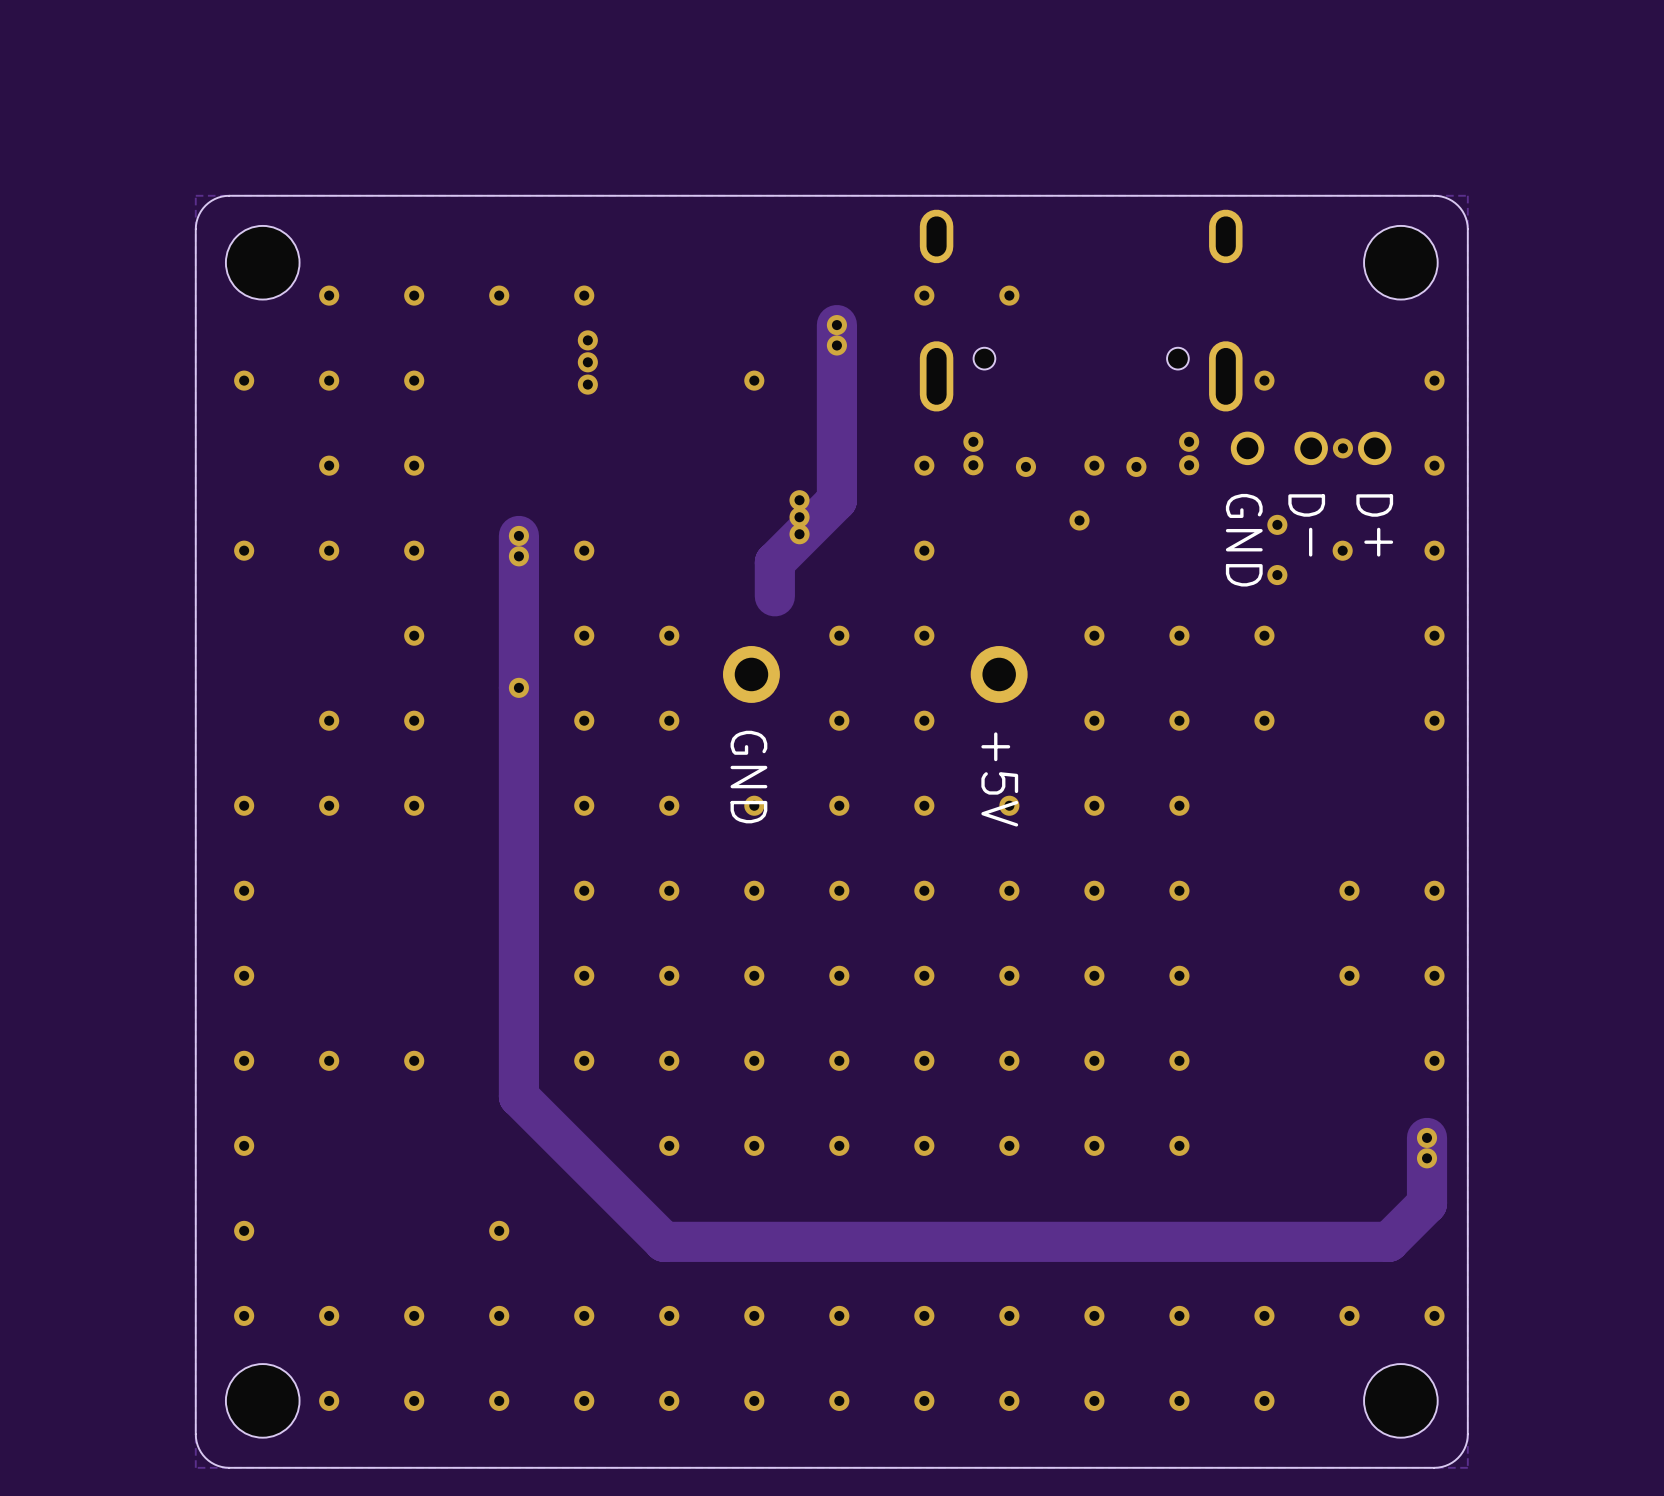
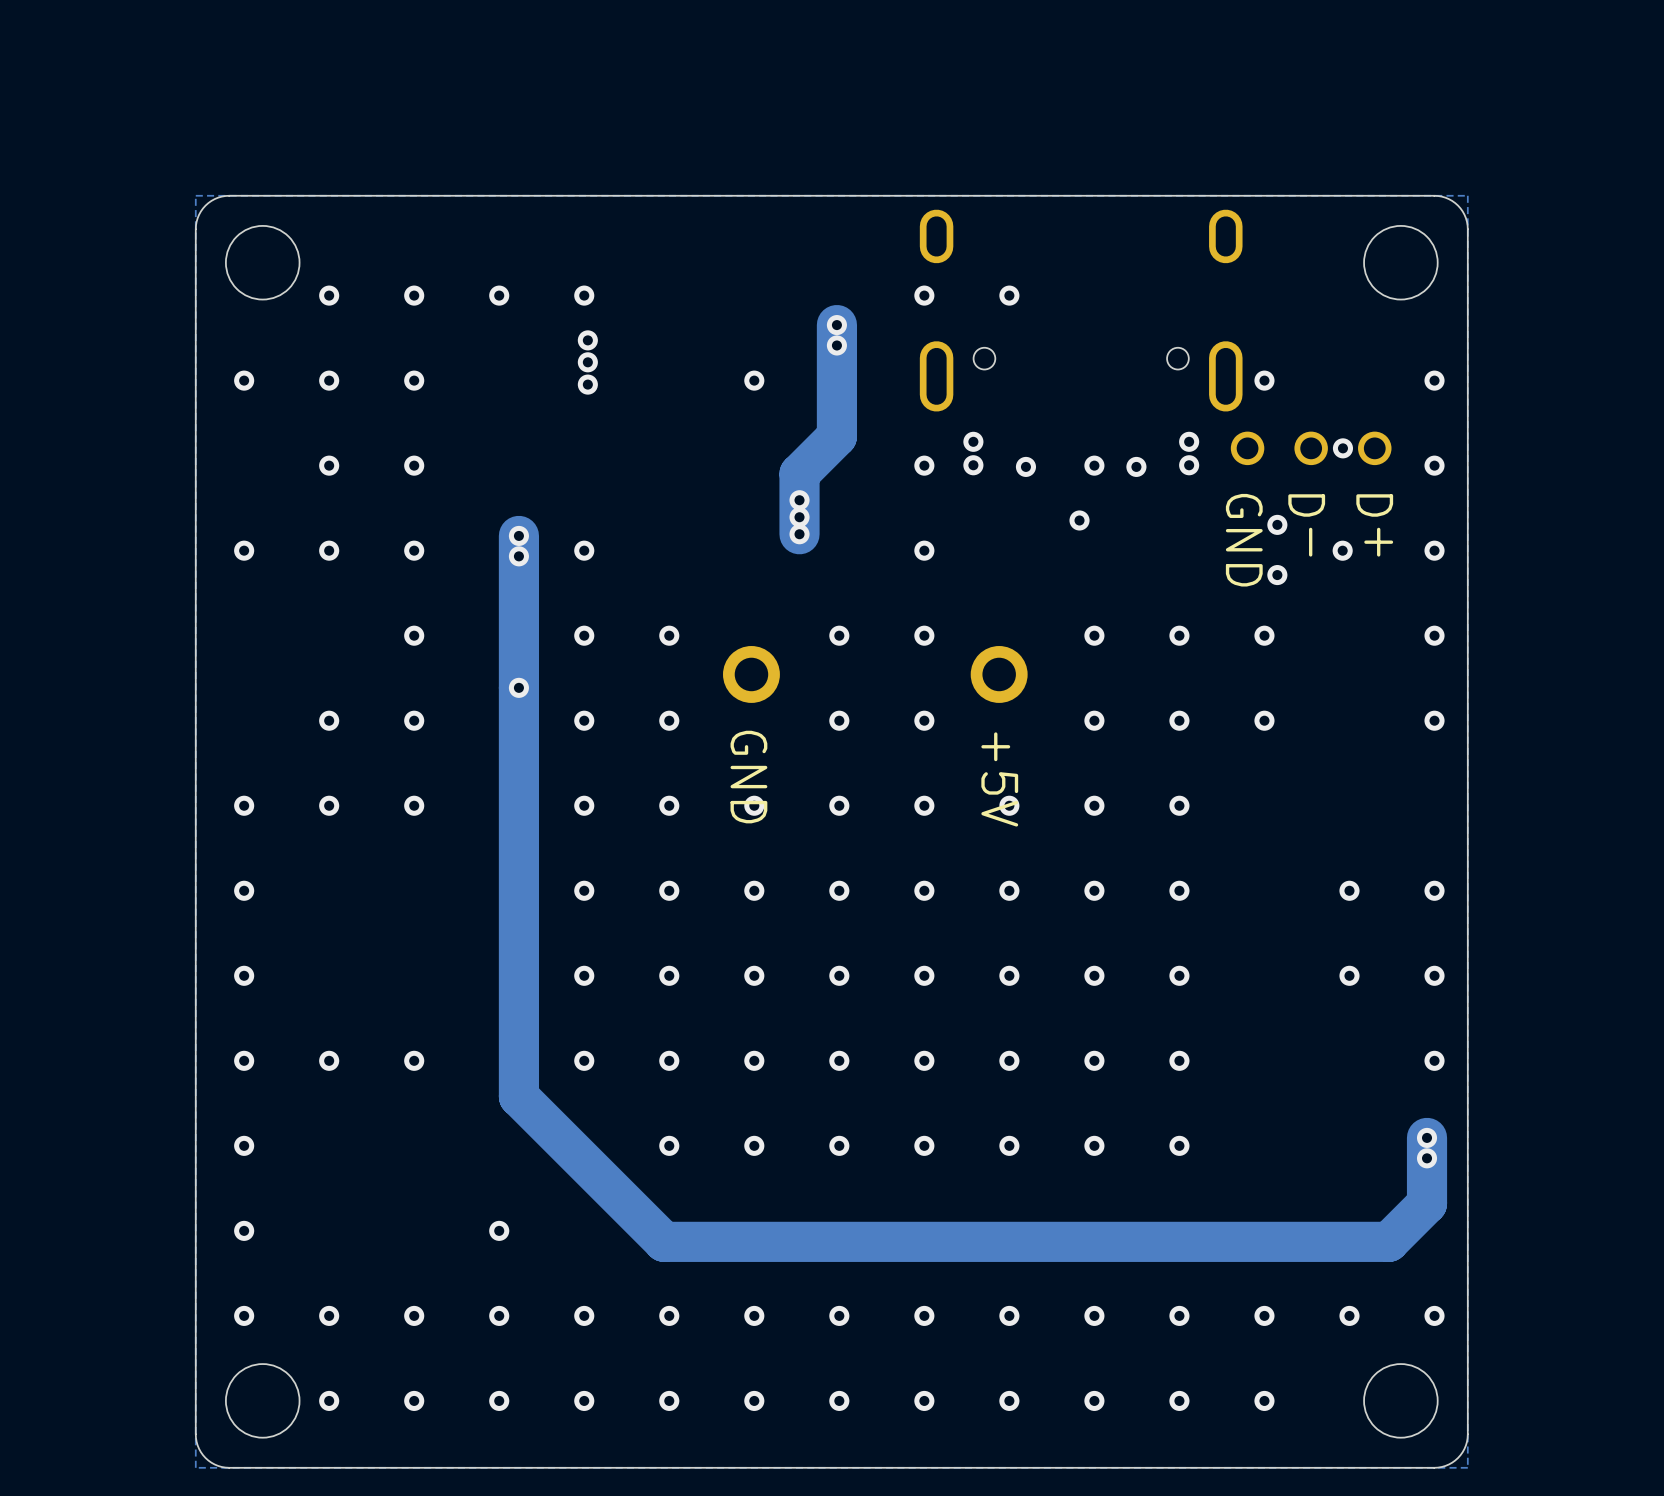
track: (836, 436) (836, 500) (774, 562) (774, 596) -> (836, 436) (799, 473) (799, 534)

